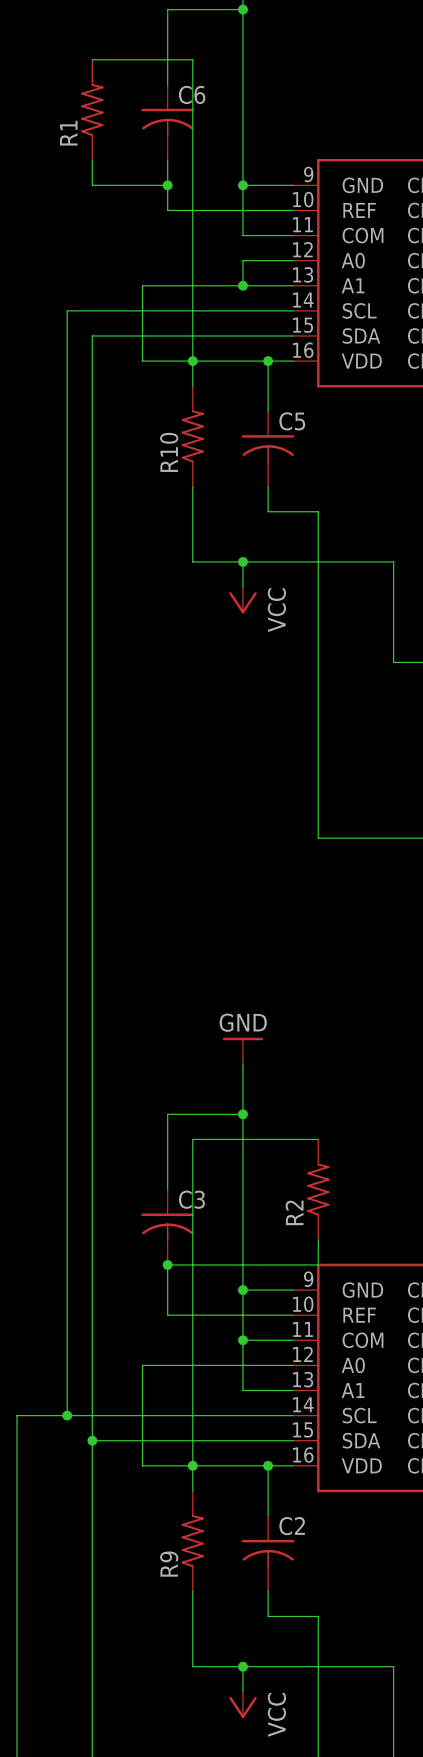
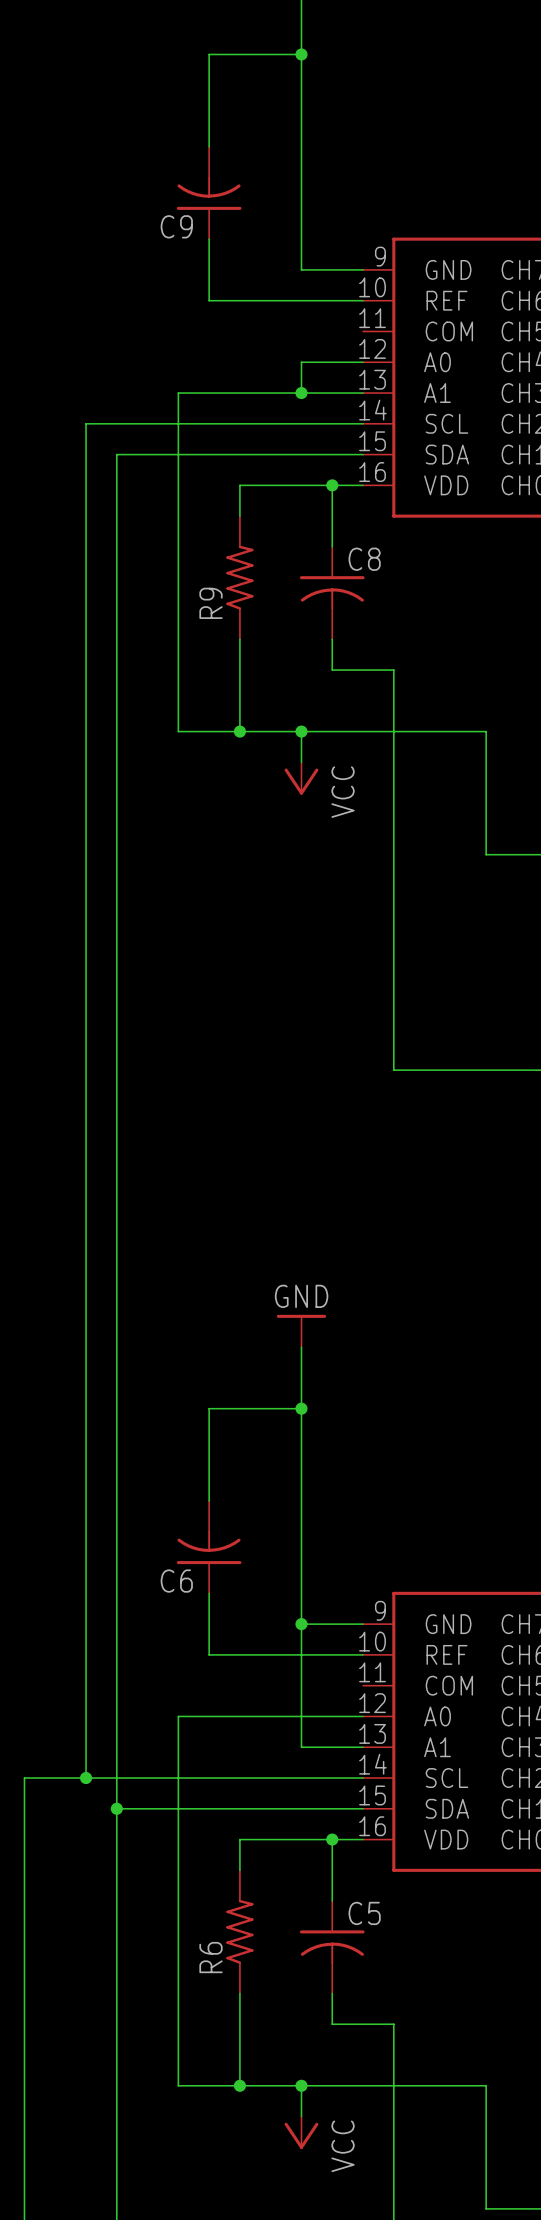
wire: (92, 59) (192, 59) (192, 361) (142, 361) -> (239, 731) (178, 731) (178, 485)
R1: (92, 110) -> none
C6 rotation: 0° (167, 122) -> 180° (209, 1547)
C6 position: (167, 122) -> (209, 1547)
C9: none -> (209, 192)
wire: (92, 160) (92, 185) (167, 185) -> none
junction: (167, 185) -> none
wire: (243, 185) (243, 235) (293, 235) -> none
junction: (243, 185) -> none
junction: (192, 361) -> none
C5 name: C5 (292, 421) -> C8 (364, 559)
R10 name: R10 (169, 452) -> R9 (210, 603)
junction: none -> (239, 731)
wire: (318, 1139) (192, 1139) (192, 1465) (142, 1465) -> (239, 2085) (178, 2085) (178, 1839)
R2: (318, 1189) -> none
C3: (167, 1227) -> none
wire: (318, 1239) (318, 1264) (167, 1264) -> none
junction: (167, 1264) -> none
wire: (243, 1340) (293, 1340) -> none
junction: (243, 1340) -> none
junction: (192, 1465) -> none
C2 name: C2 (292, 1526) -> C5 (364, 1913)
R9 name: R9 (169, 1564) -> R6 (210, 1957)
junction: none -> (239, 2085)

